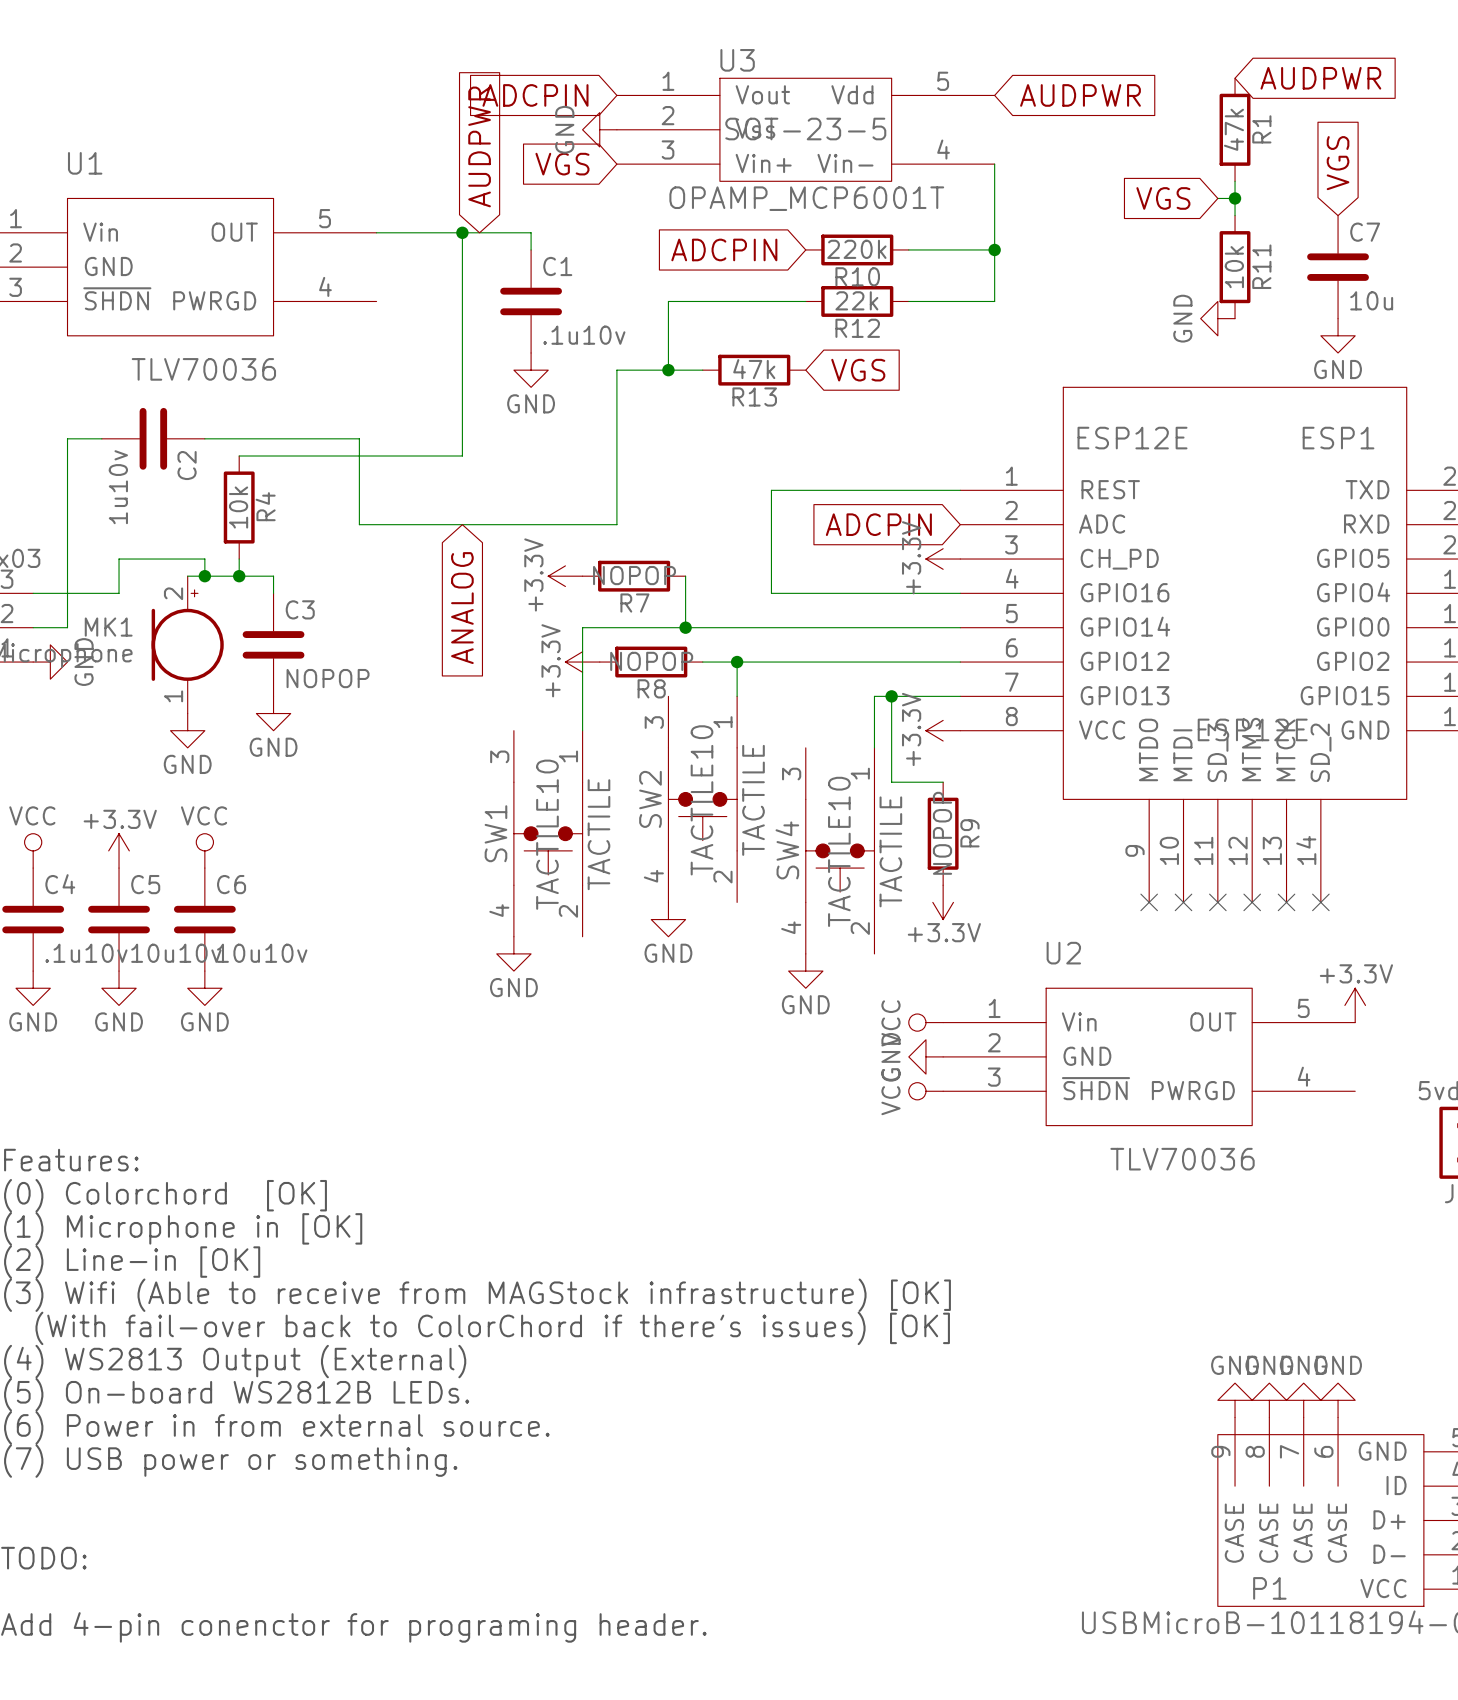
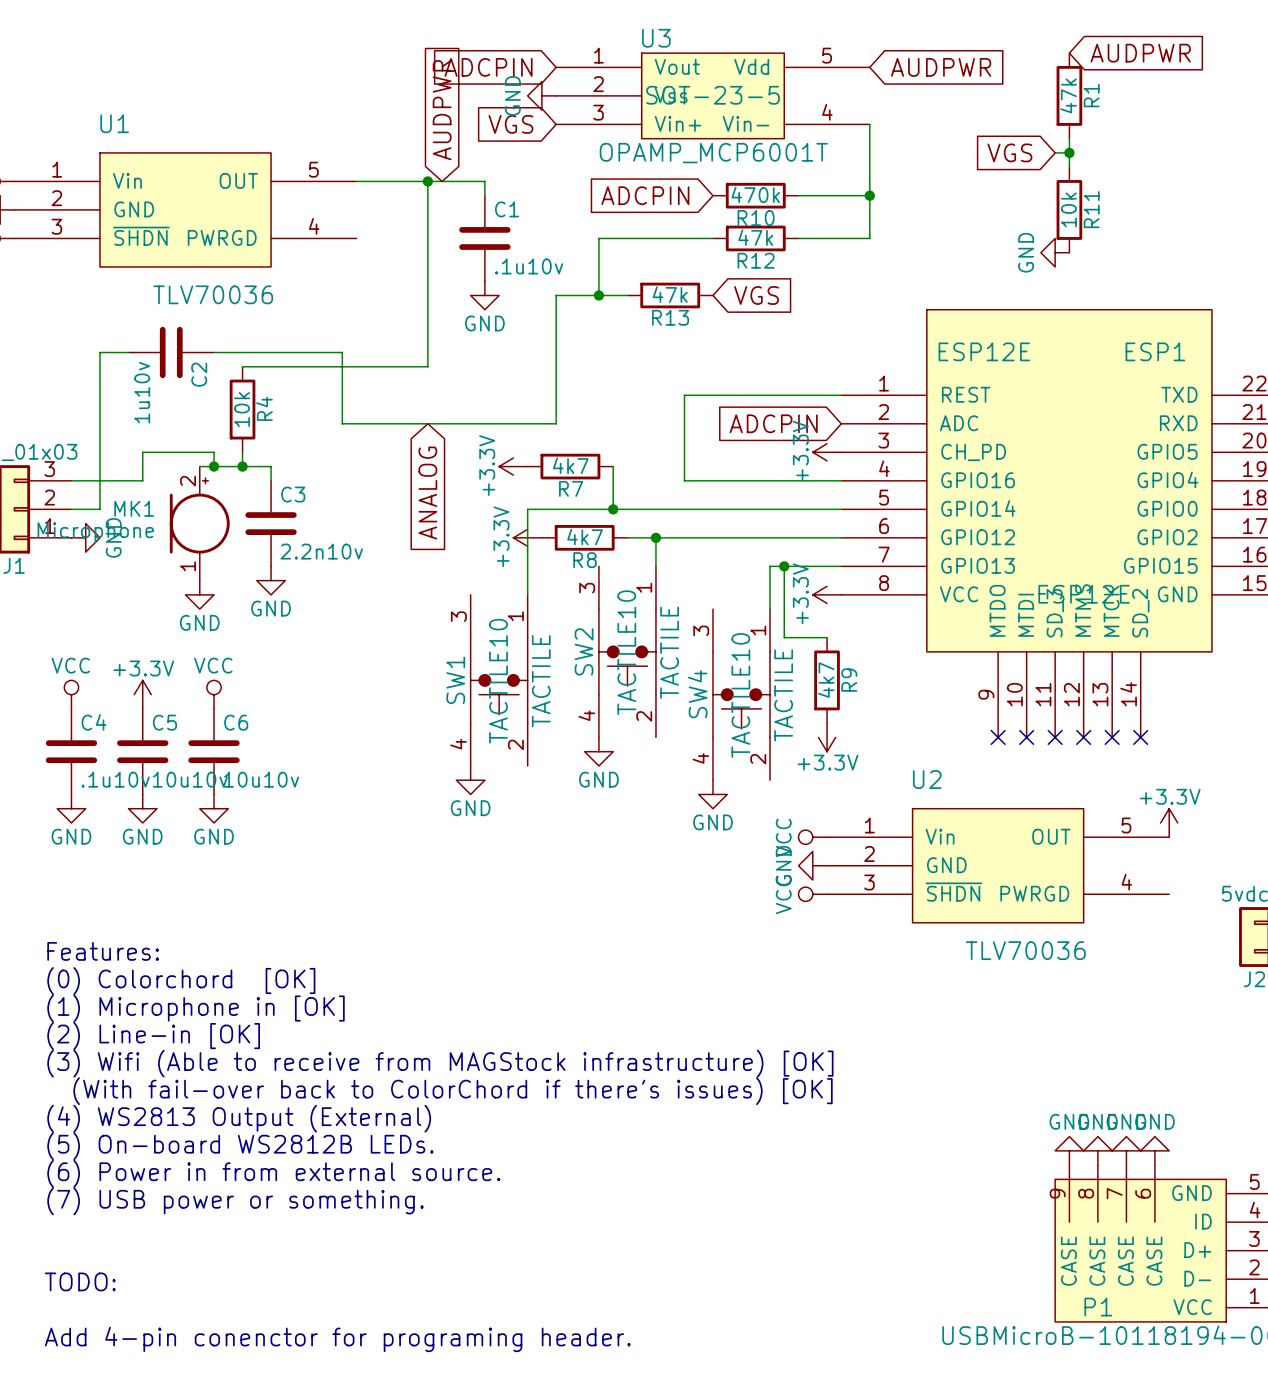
global label: VGS (1338, 163) -> none
R10 value: 220k (856, 249) -> 470k (755, 194)
C7: 10u (1338, 267) -> none
R12 value: 22k (856, 300) -> 47k (755, 237)
power symbol: GND (1338, 335) -> none
R7 value: NOPOP (634, 575) -> 4k7 (570, 465)
R8 value: NOPOP (651, 661) -> 4k7 (585, 536)
C3 value: NOPOP (328, 678) -> 2.2n10v (321, 551)
R9 value: NOPOP (942, 833) -> 4k7 (826, 680)

